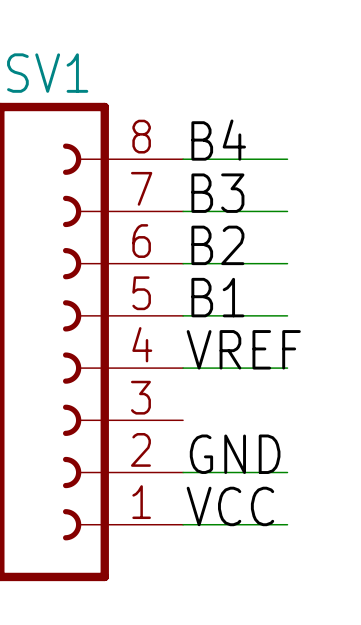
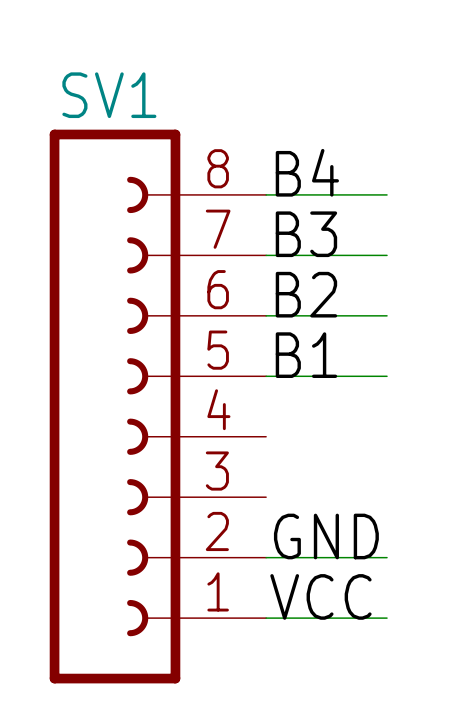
label: VREF (243, 349) -> none
wire: (183, 368) (287, 368) -> none

